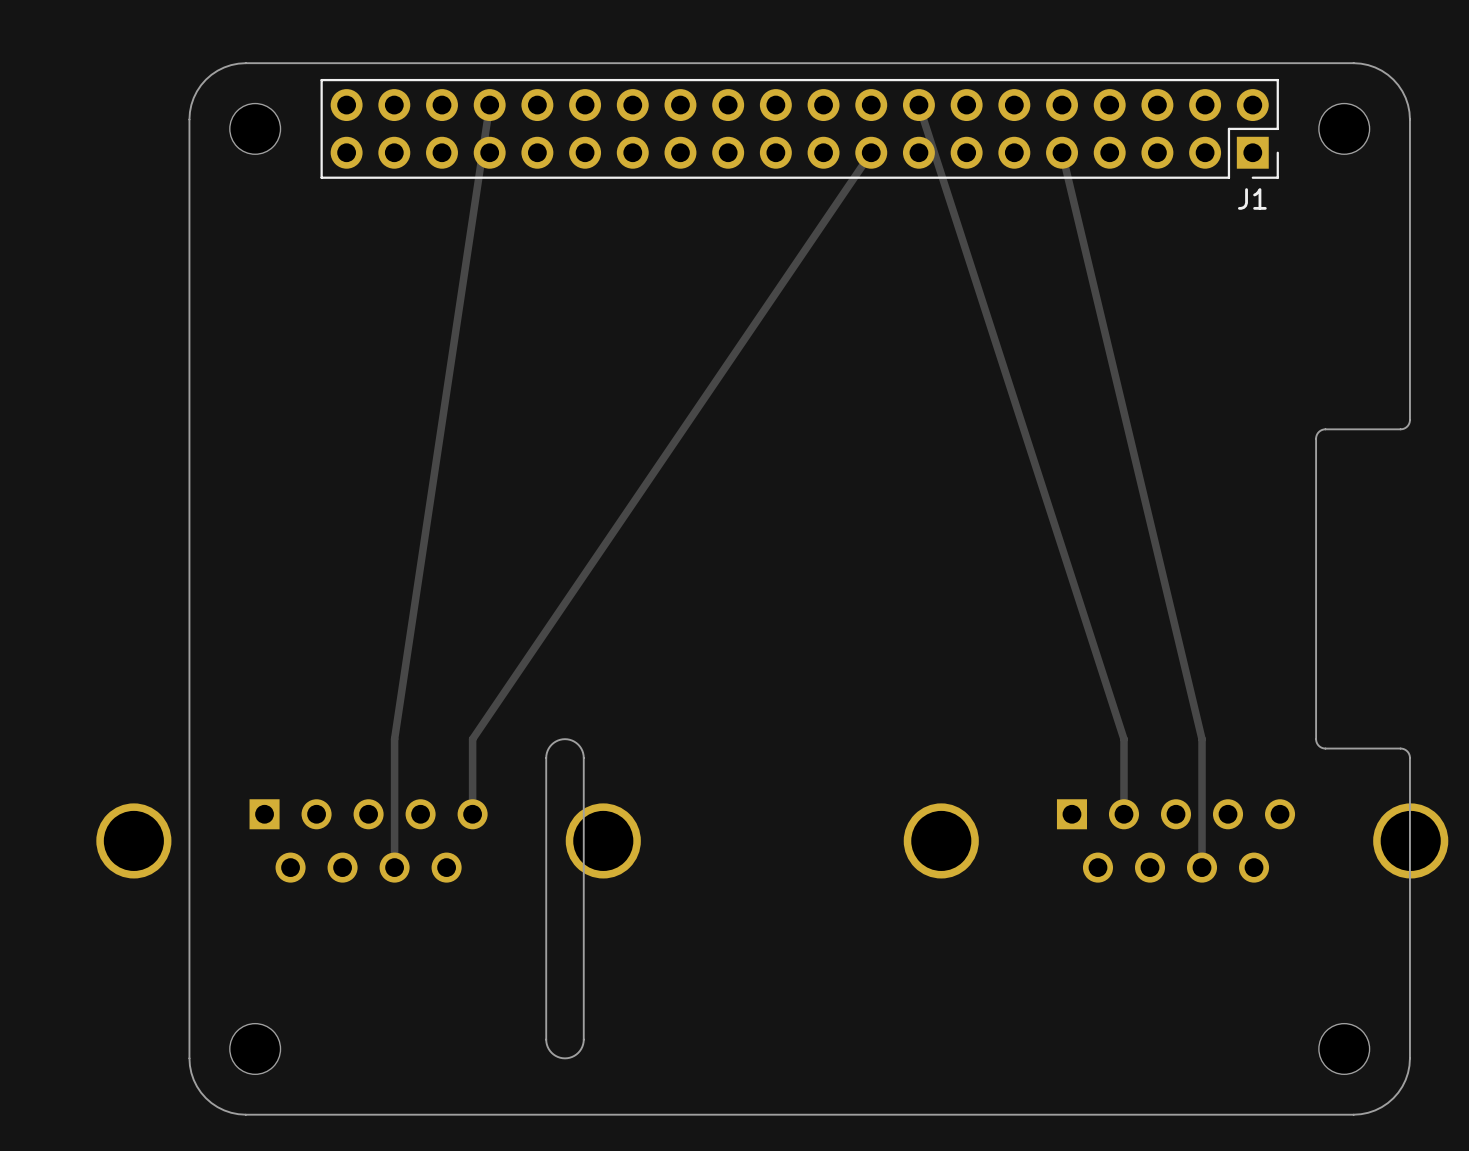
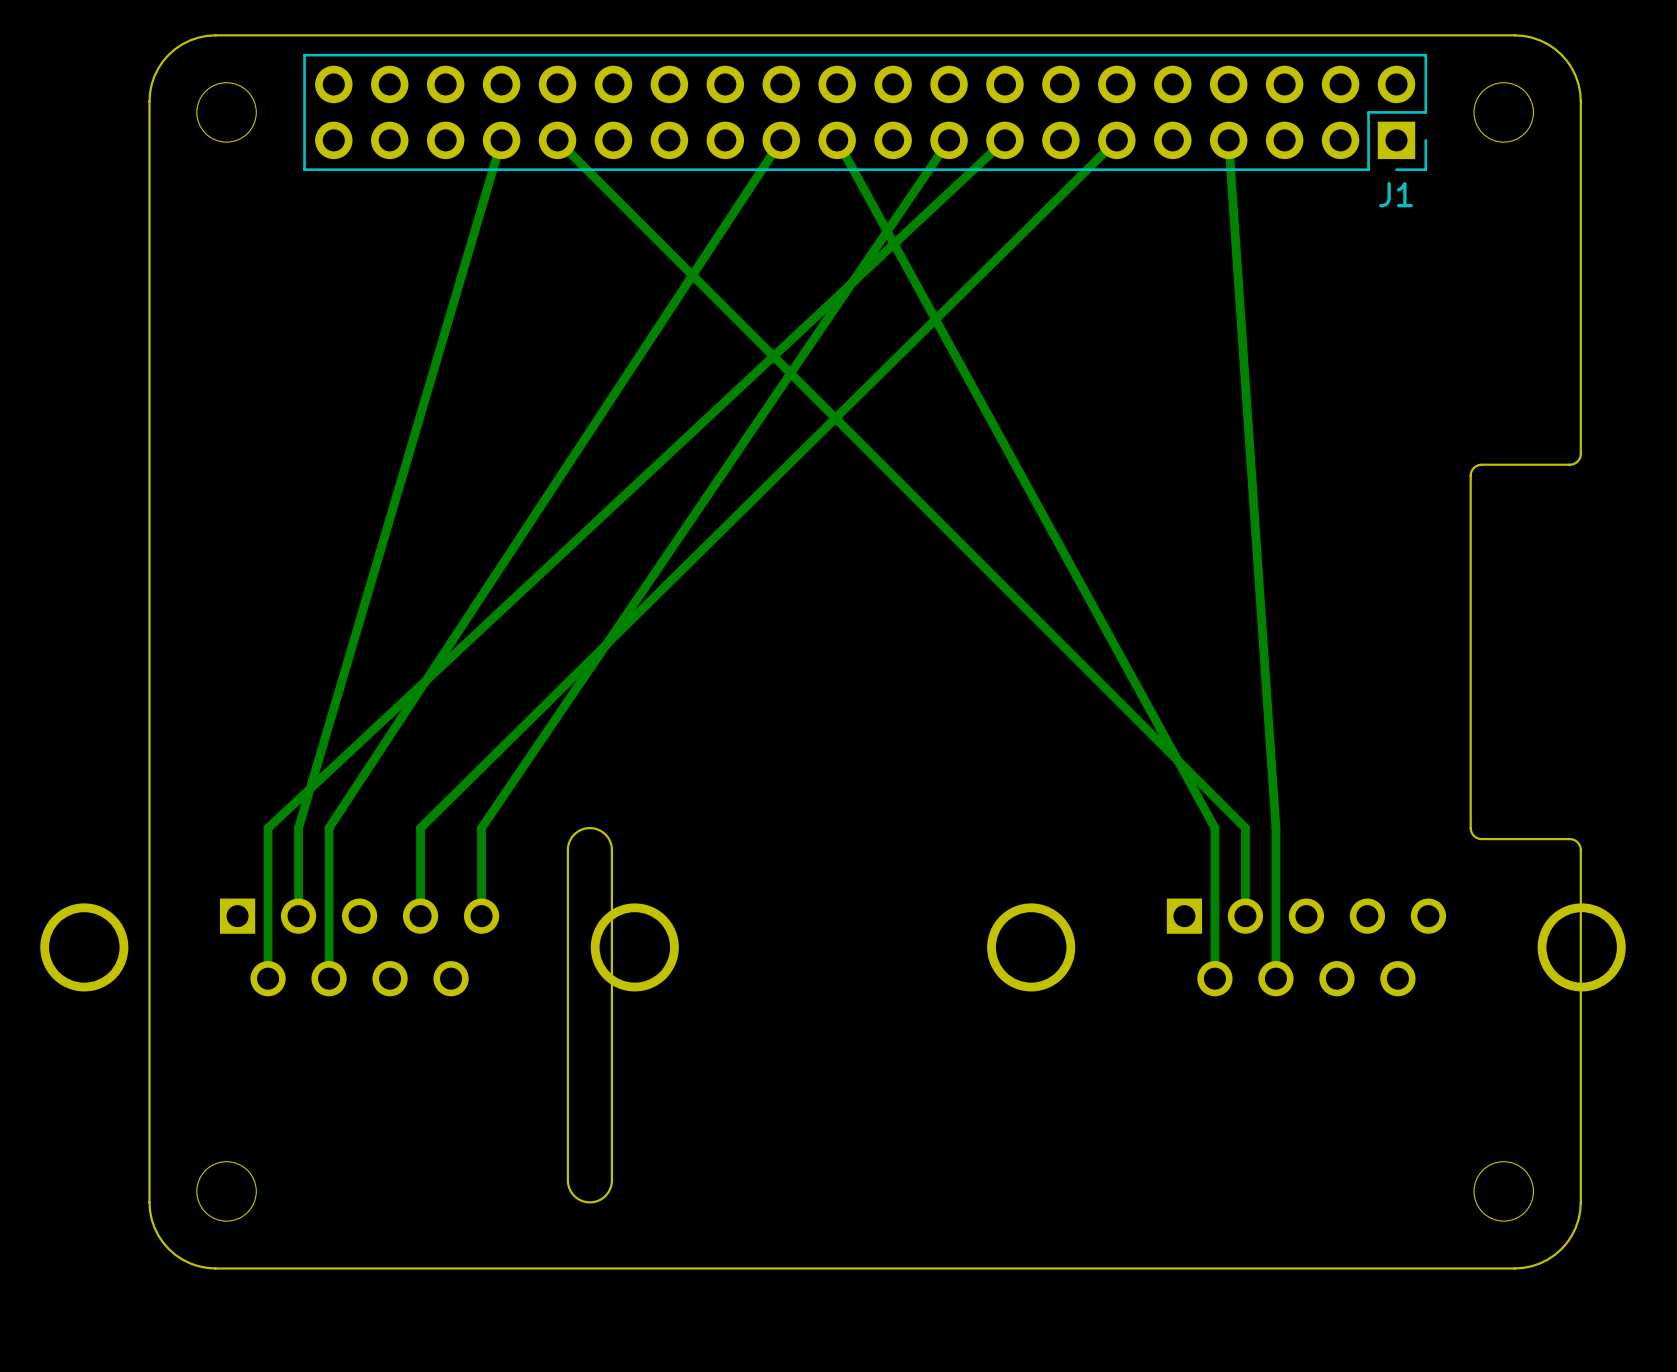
track: (489, 105) (394, 739) (394, 867) -> none
track: (918, 105) (1123, 739) -> (557, 140) (1245, 828)
track: none -> (501, 140) (298, 828) (298, 916)
track: none -> (781, 140) (329, 828) (329, 978)
track: none -> (837, 140) (1214, 828) (1214, 978)
track: none -> (1004, 140) (268, 828) (268, 978)
track: none -> (1116, 140) (420, 828) (420, 916)
track: (1062, 152) (1202, 739) (1202, 867) -> none
track: none -> (1228, 140) (1275, 828) (1275, 978)

